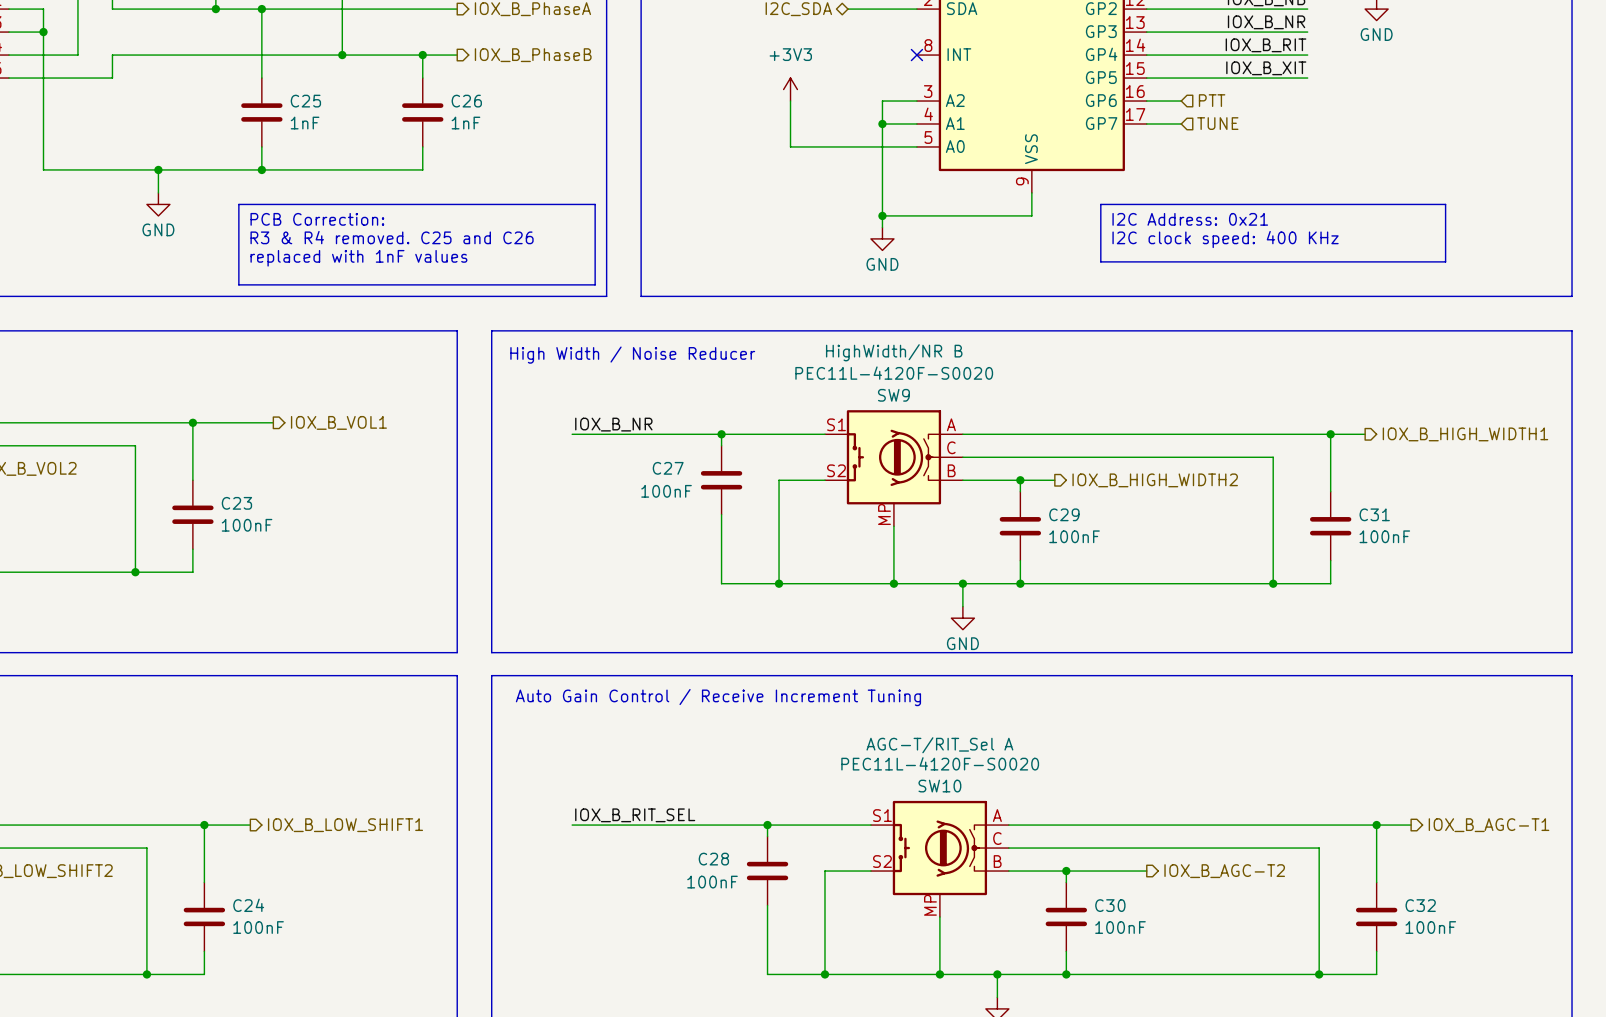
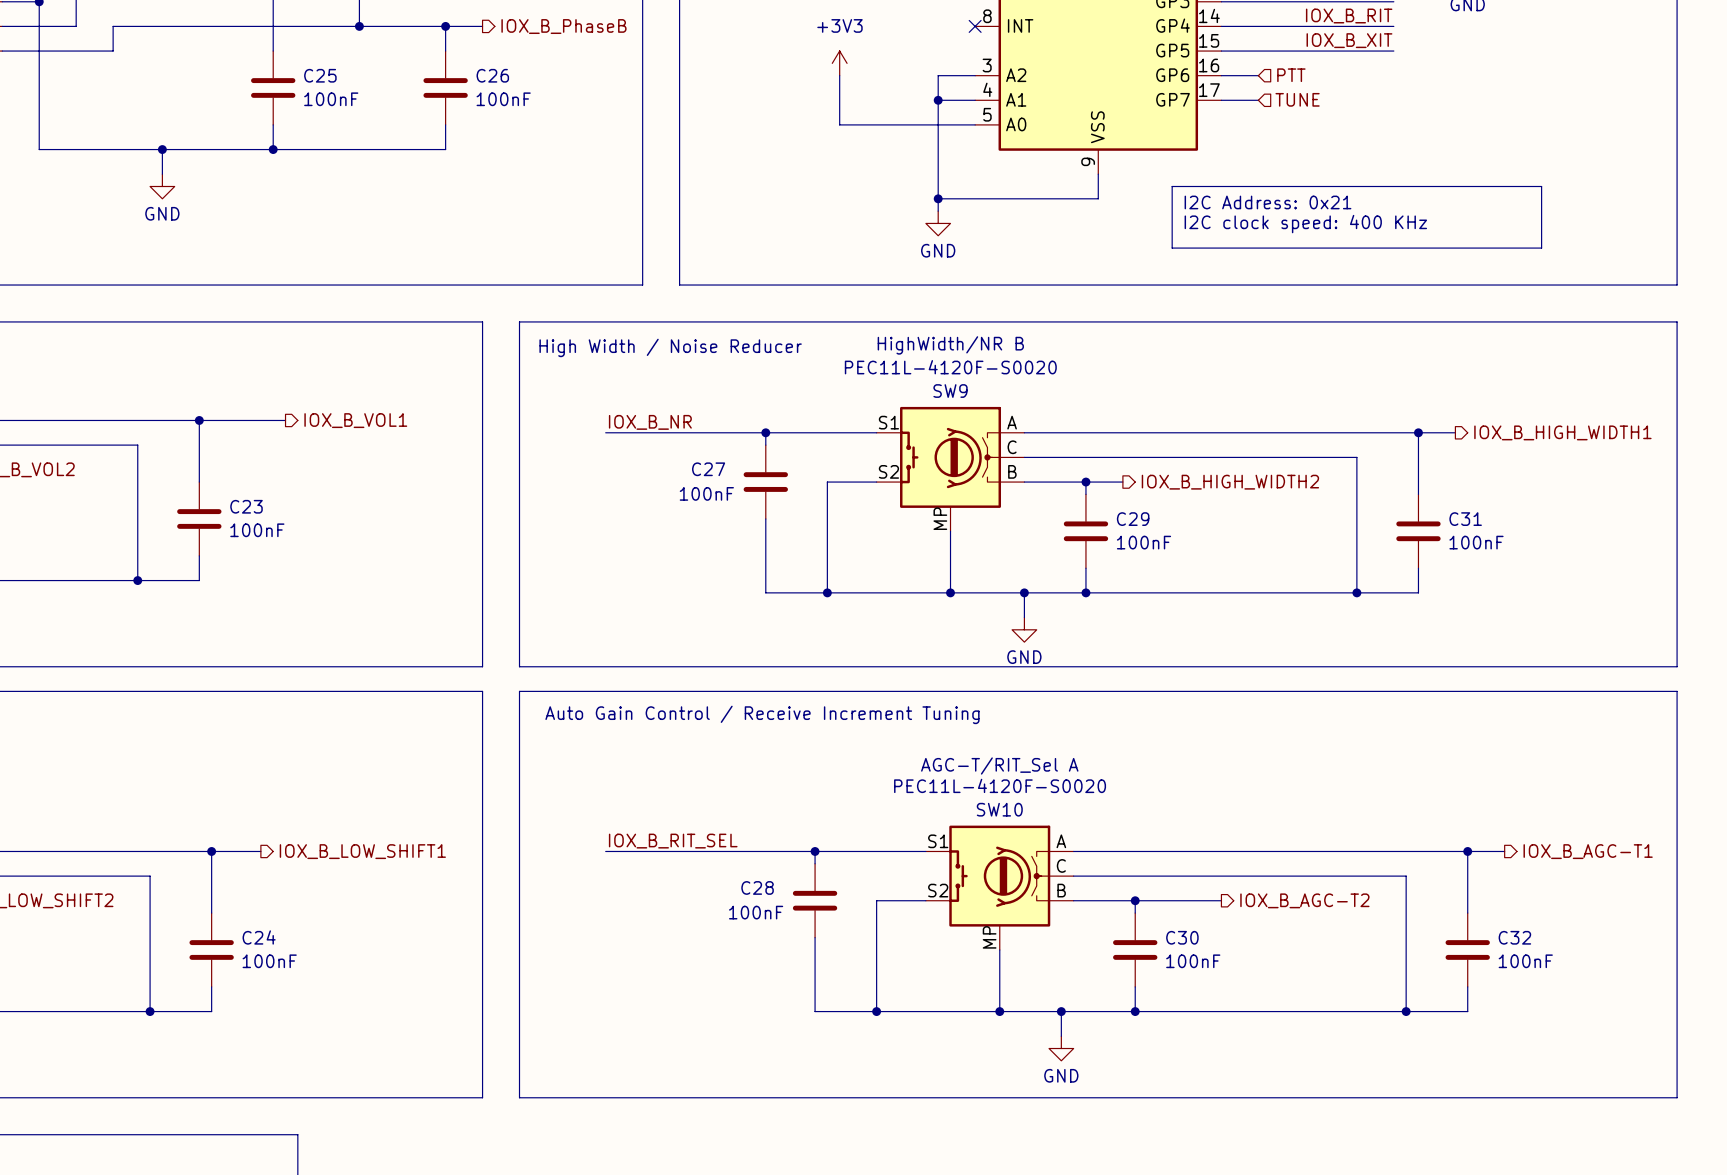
C25 value: 1nF (305, 123) -> 100nF (331, 99)
C26 value: 1nF (465, 123) -> 100nF (503, 99)
line: (238, 204) (595, 204) (595, 284) (238, 284) (238, 204) -> none
text: PCB Correction: (317, 219) -> none
text: R3 & R4 removed. C25 and C26 (392, 237) -> none
text: replaced with 1nF values (358, 258) -> none

